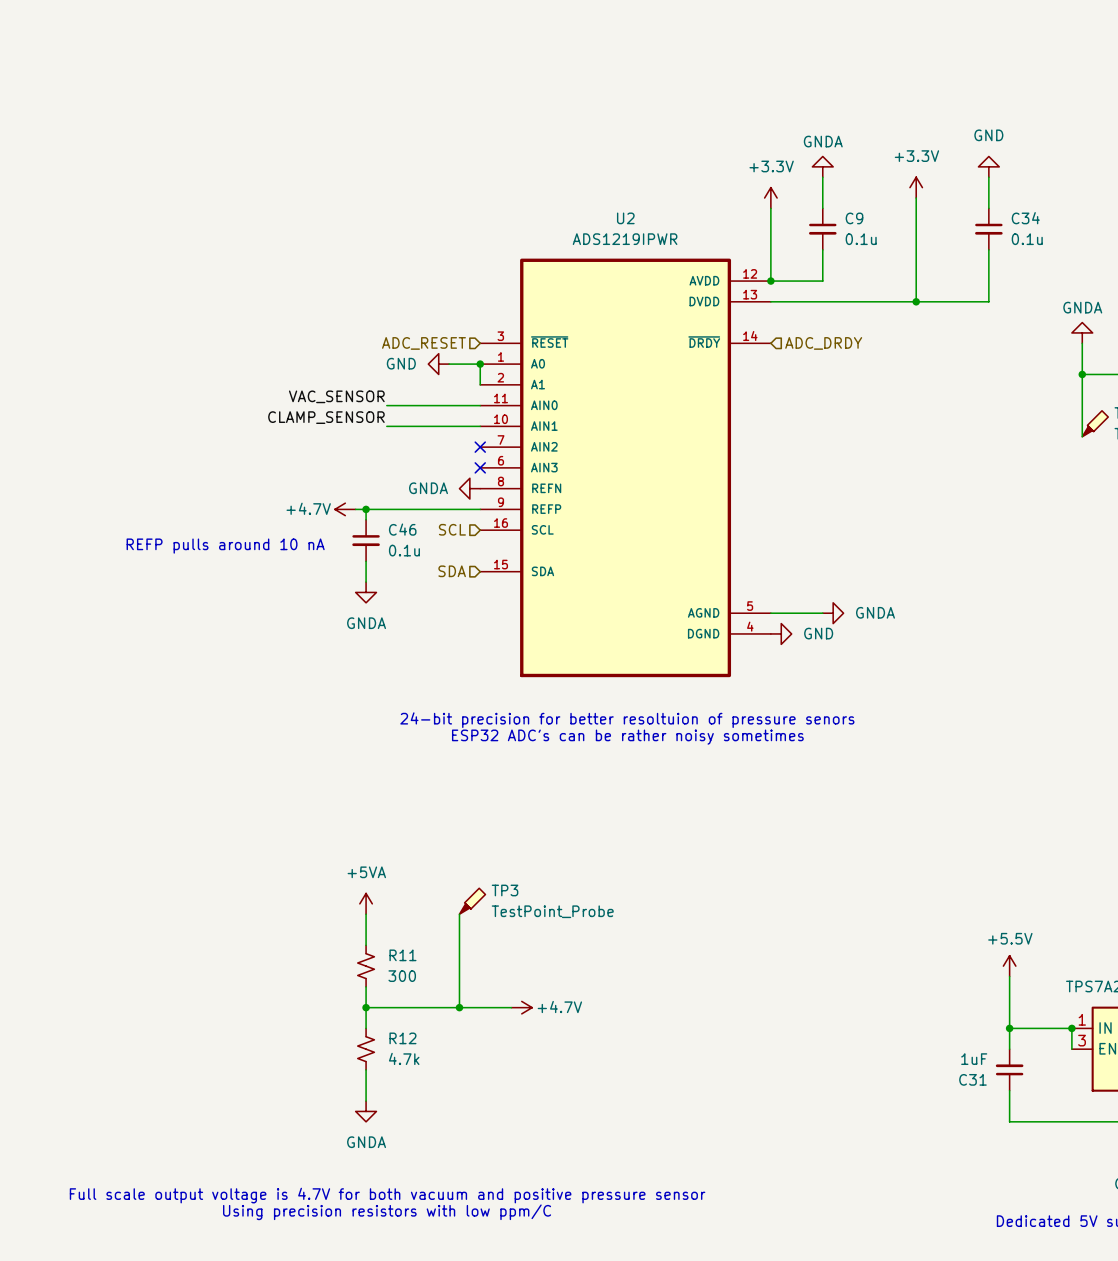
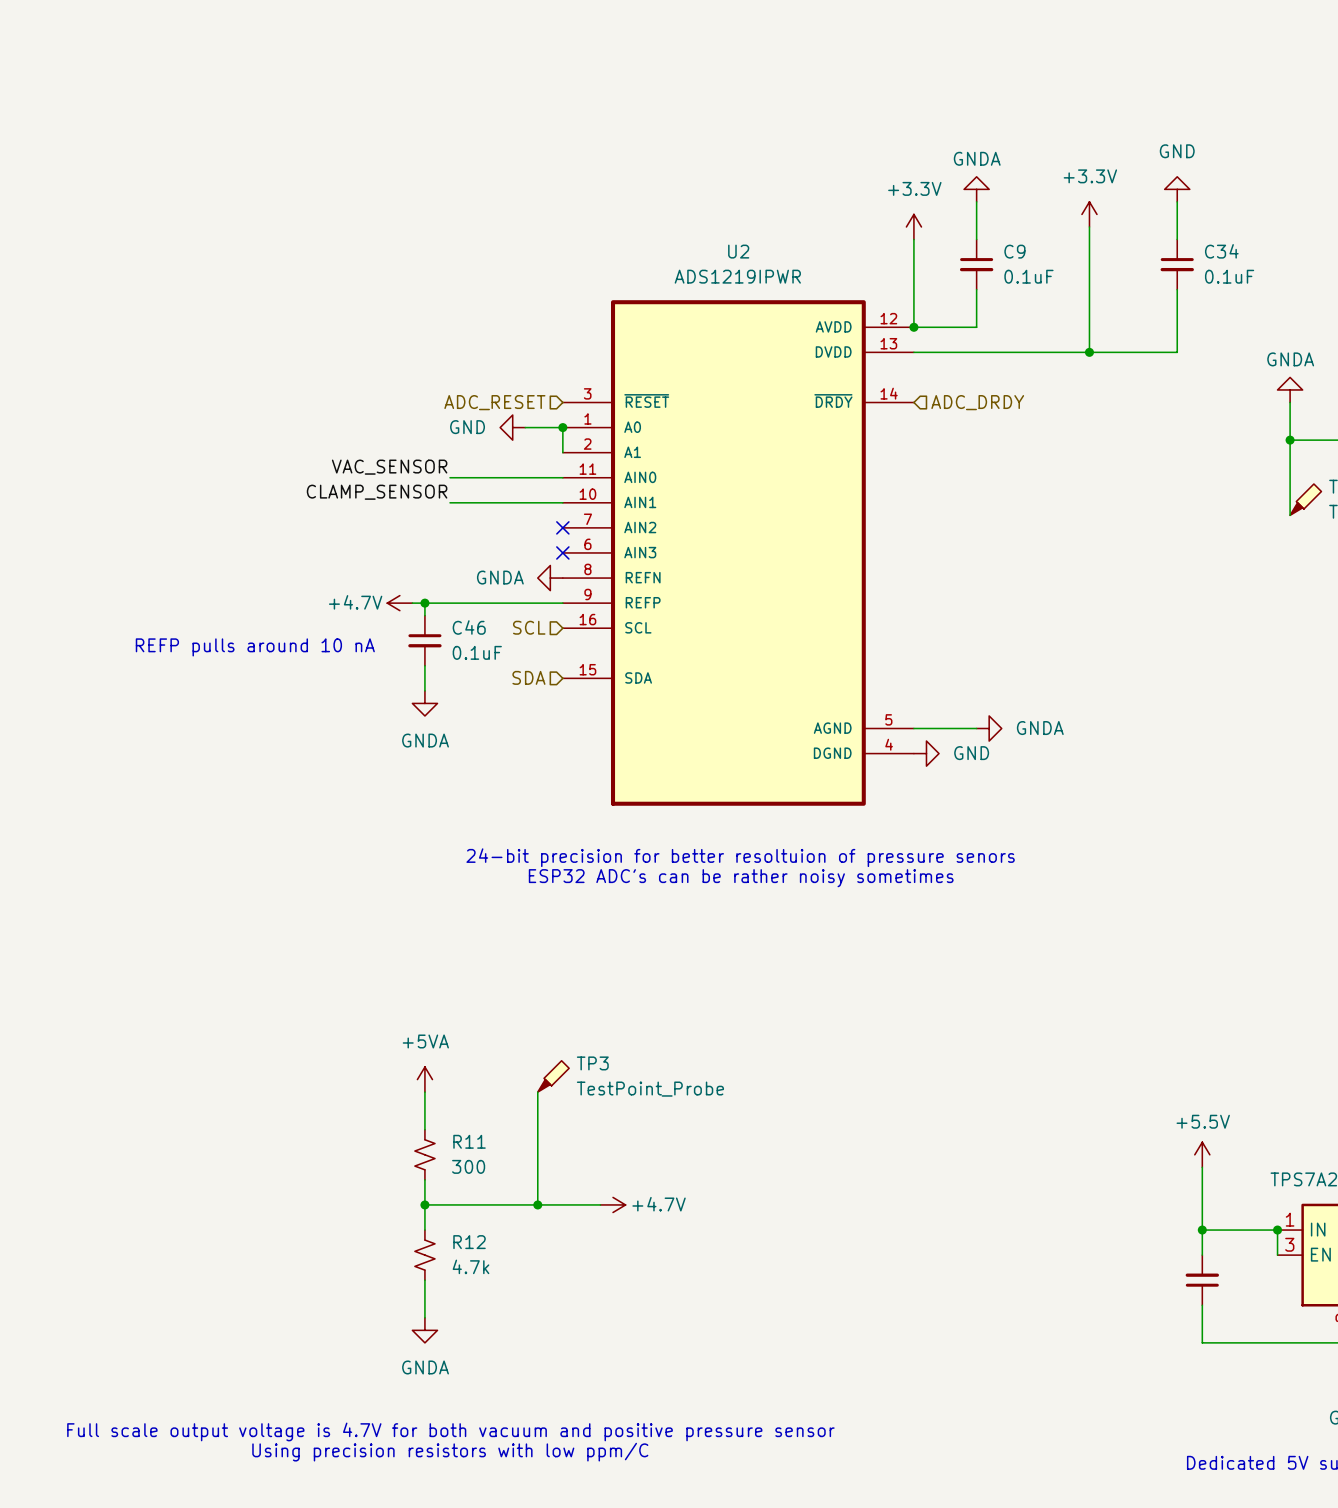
C9 value: 0.1u (861, 239) -> 0.1uF (1028, 276)
C34 value: 0.1u (1027, 239) -> 0.1uF (1229, 276)
C46 value: 0.1u (404, 550) -> 0.1uF (477, 652)
C31 value: 1uF (974, 1059) -> none
C31 name: C31 (972, 1079) -> none

